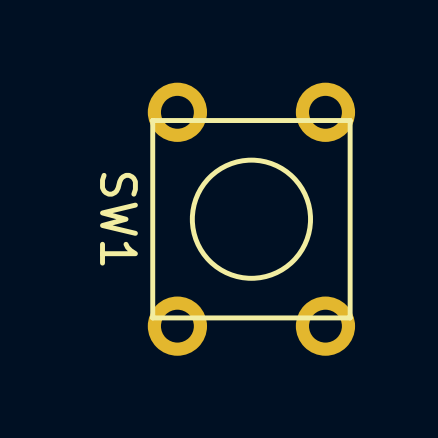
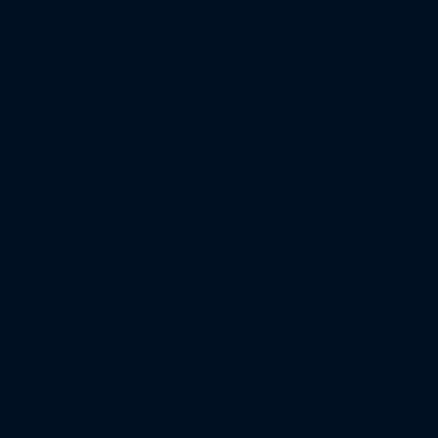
SW1: (251, 219) -> none

